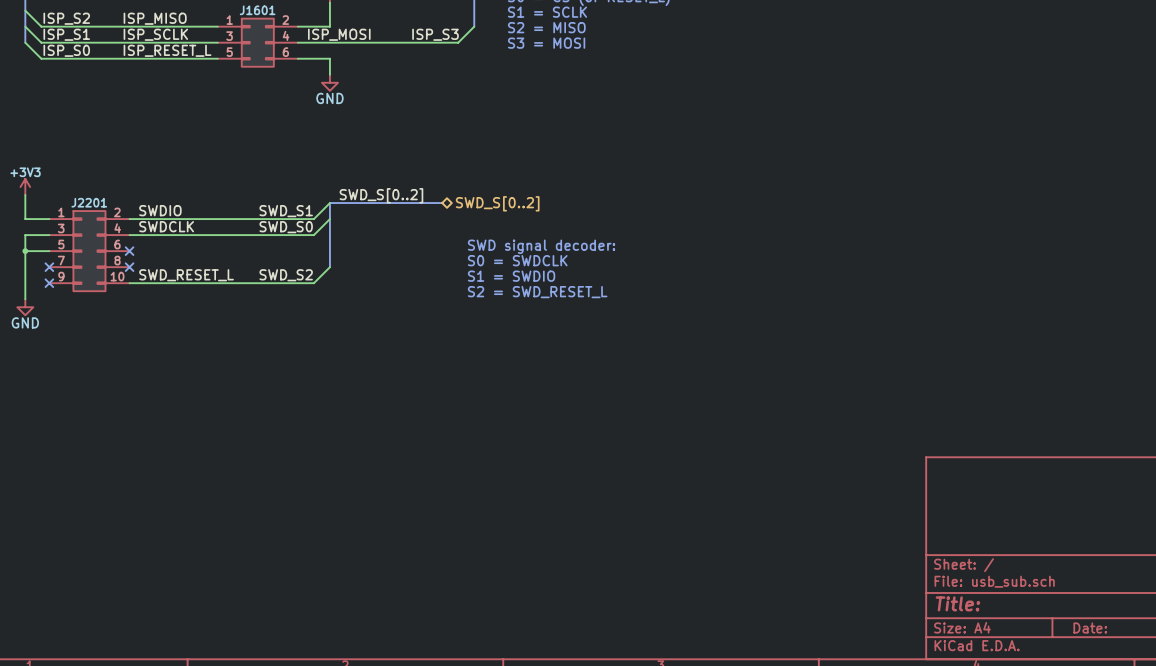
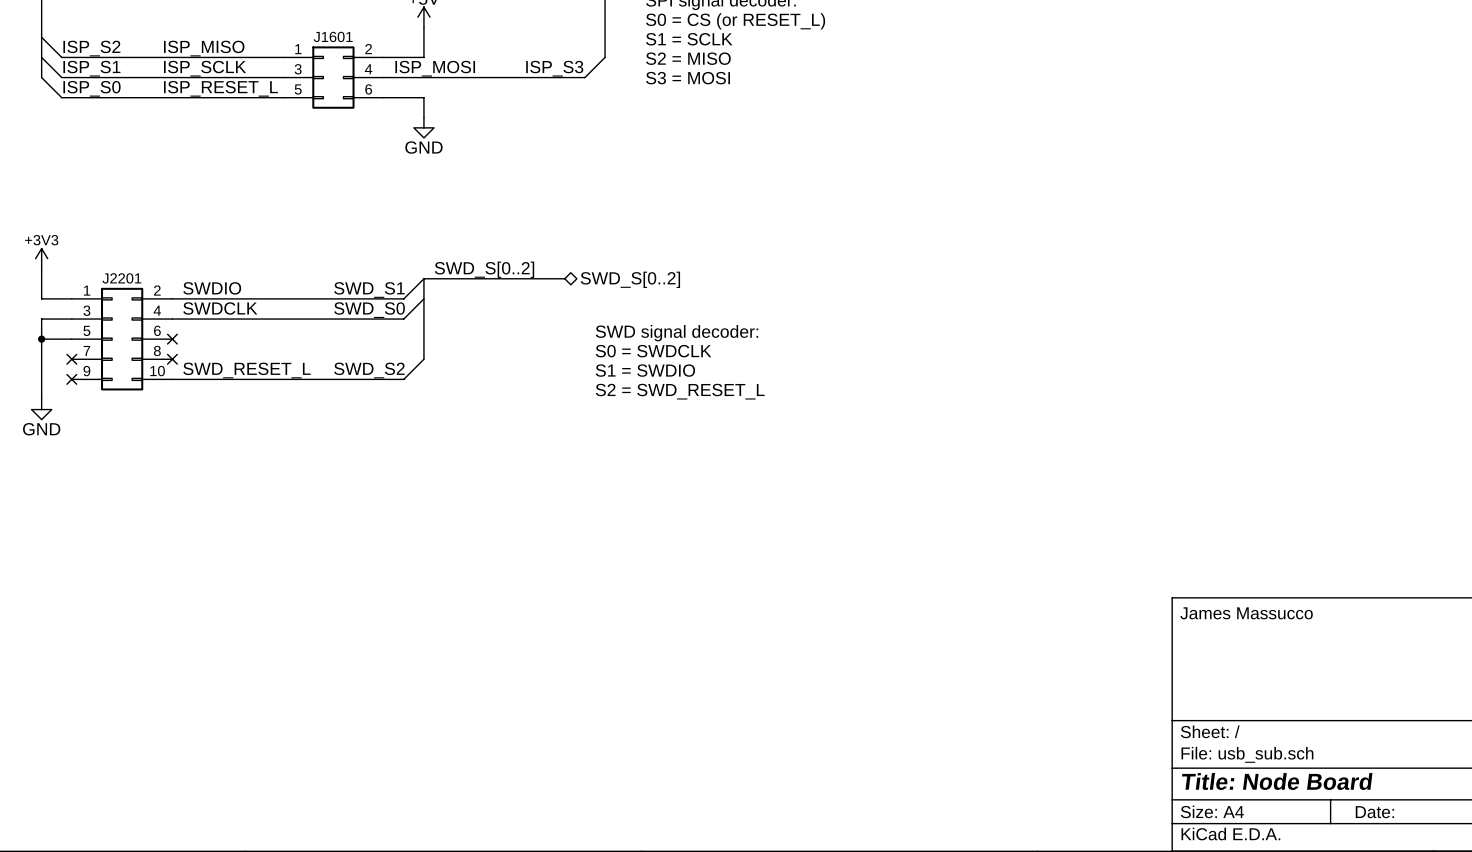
title block: none -> James Massucco (1246, 613)
title block: Title: (957, 603) -> Title: Node Board (1277, 781)

